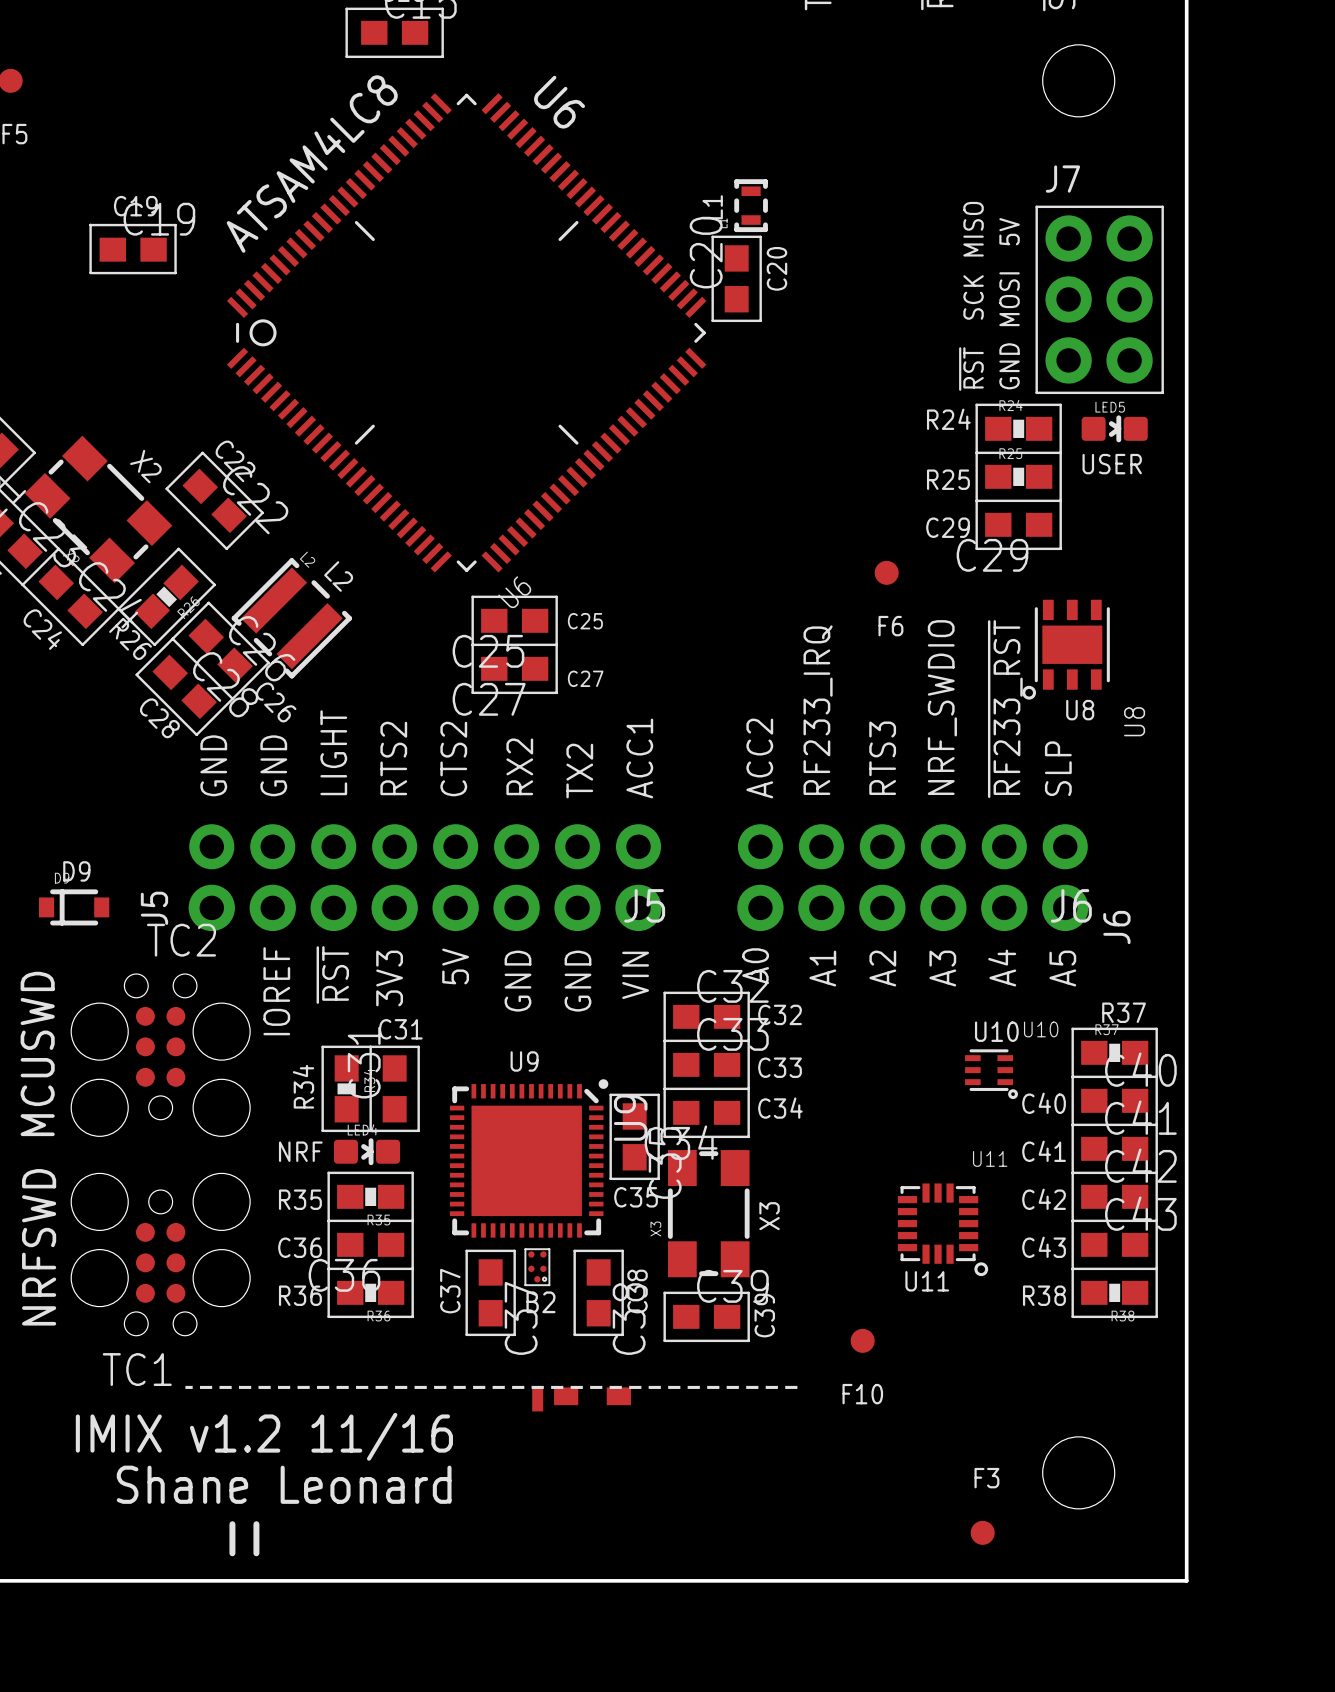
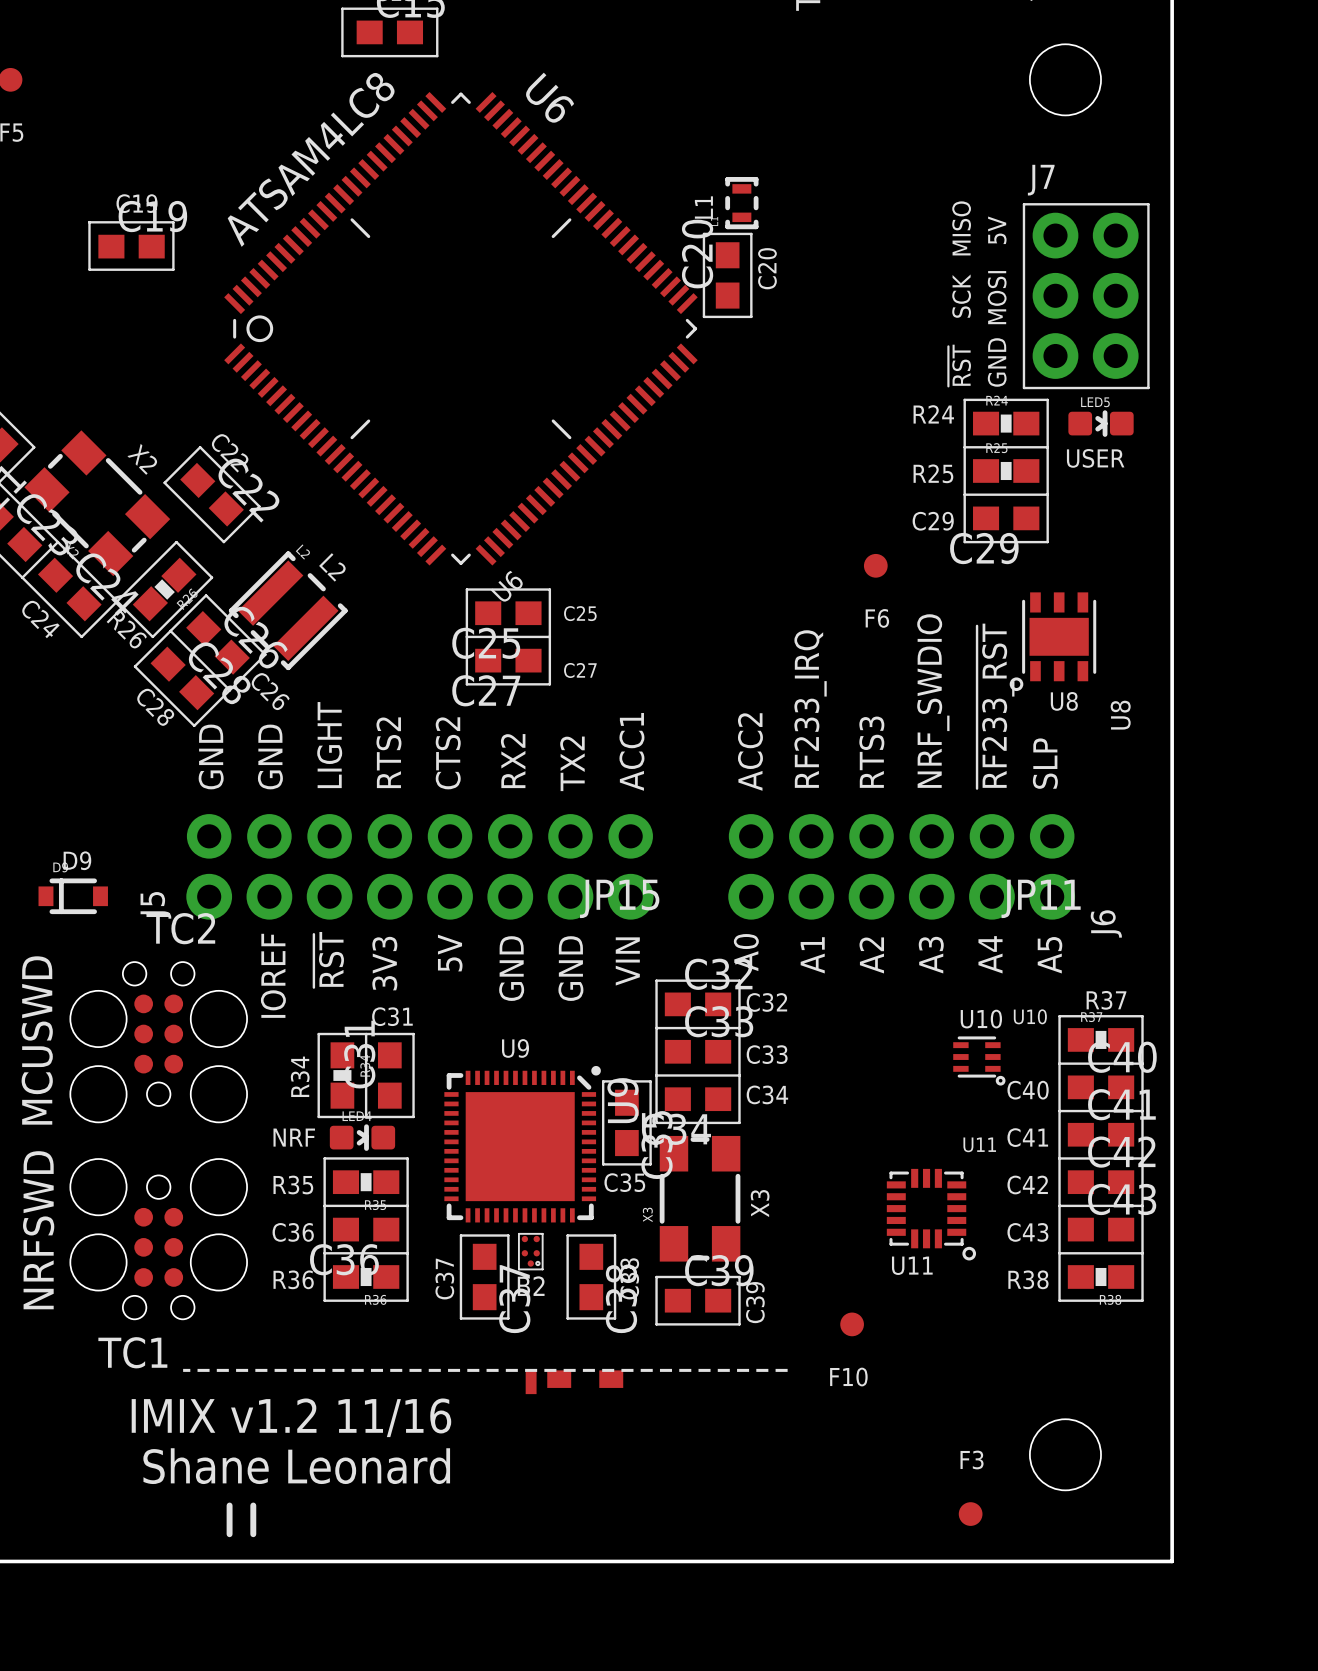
J5 name: J5 (644, 905) -> JP15 (619, 898)
J6 name: J6 (1071, 905) -> JP11 (1041, 898)

